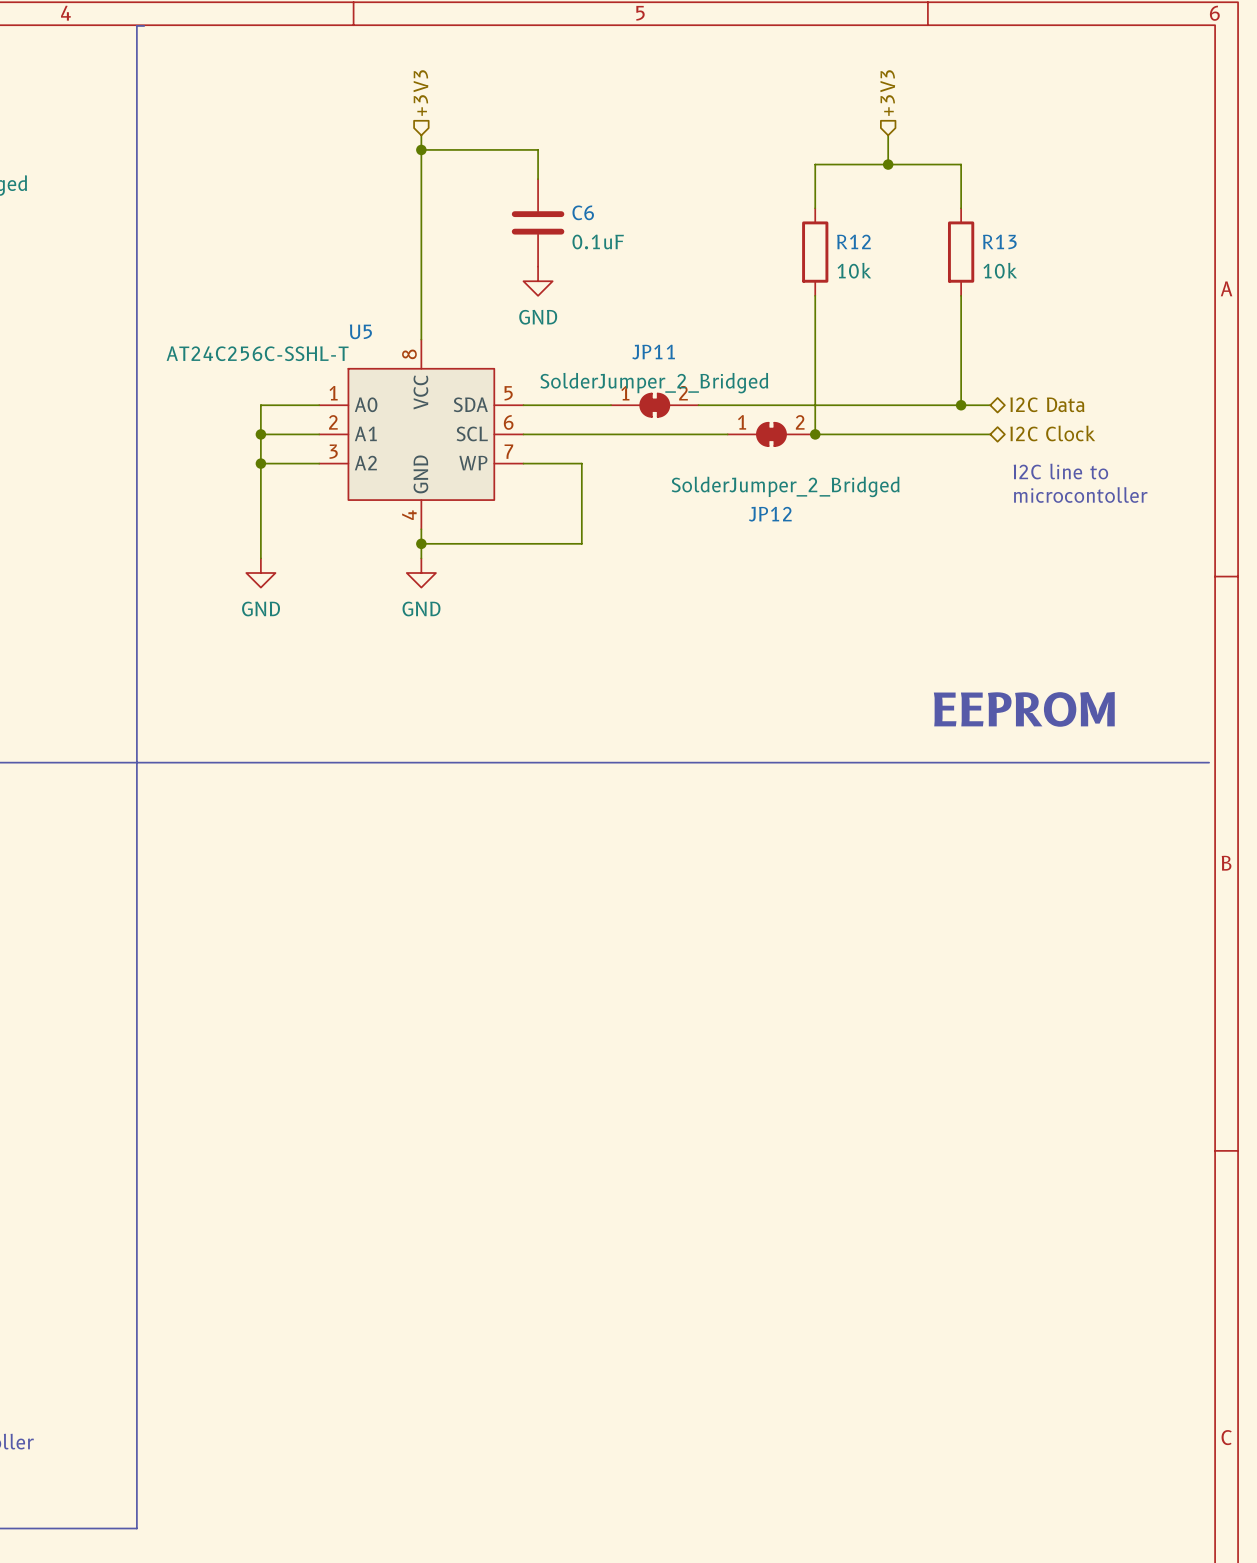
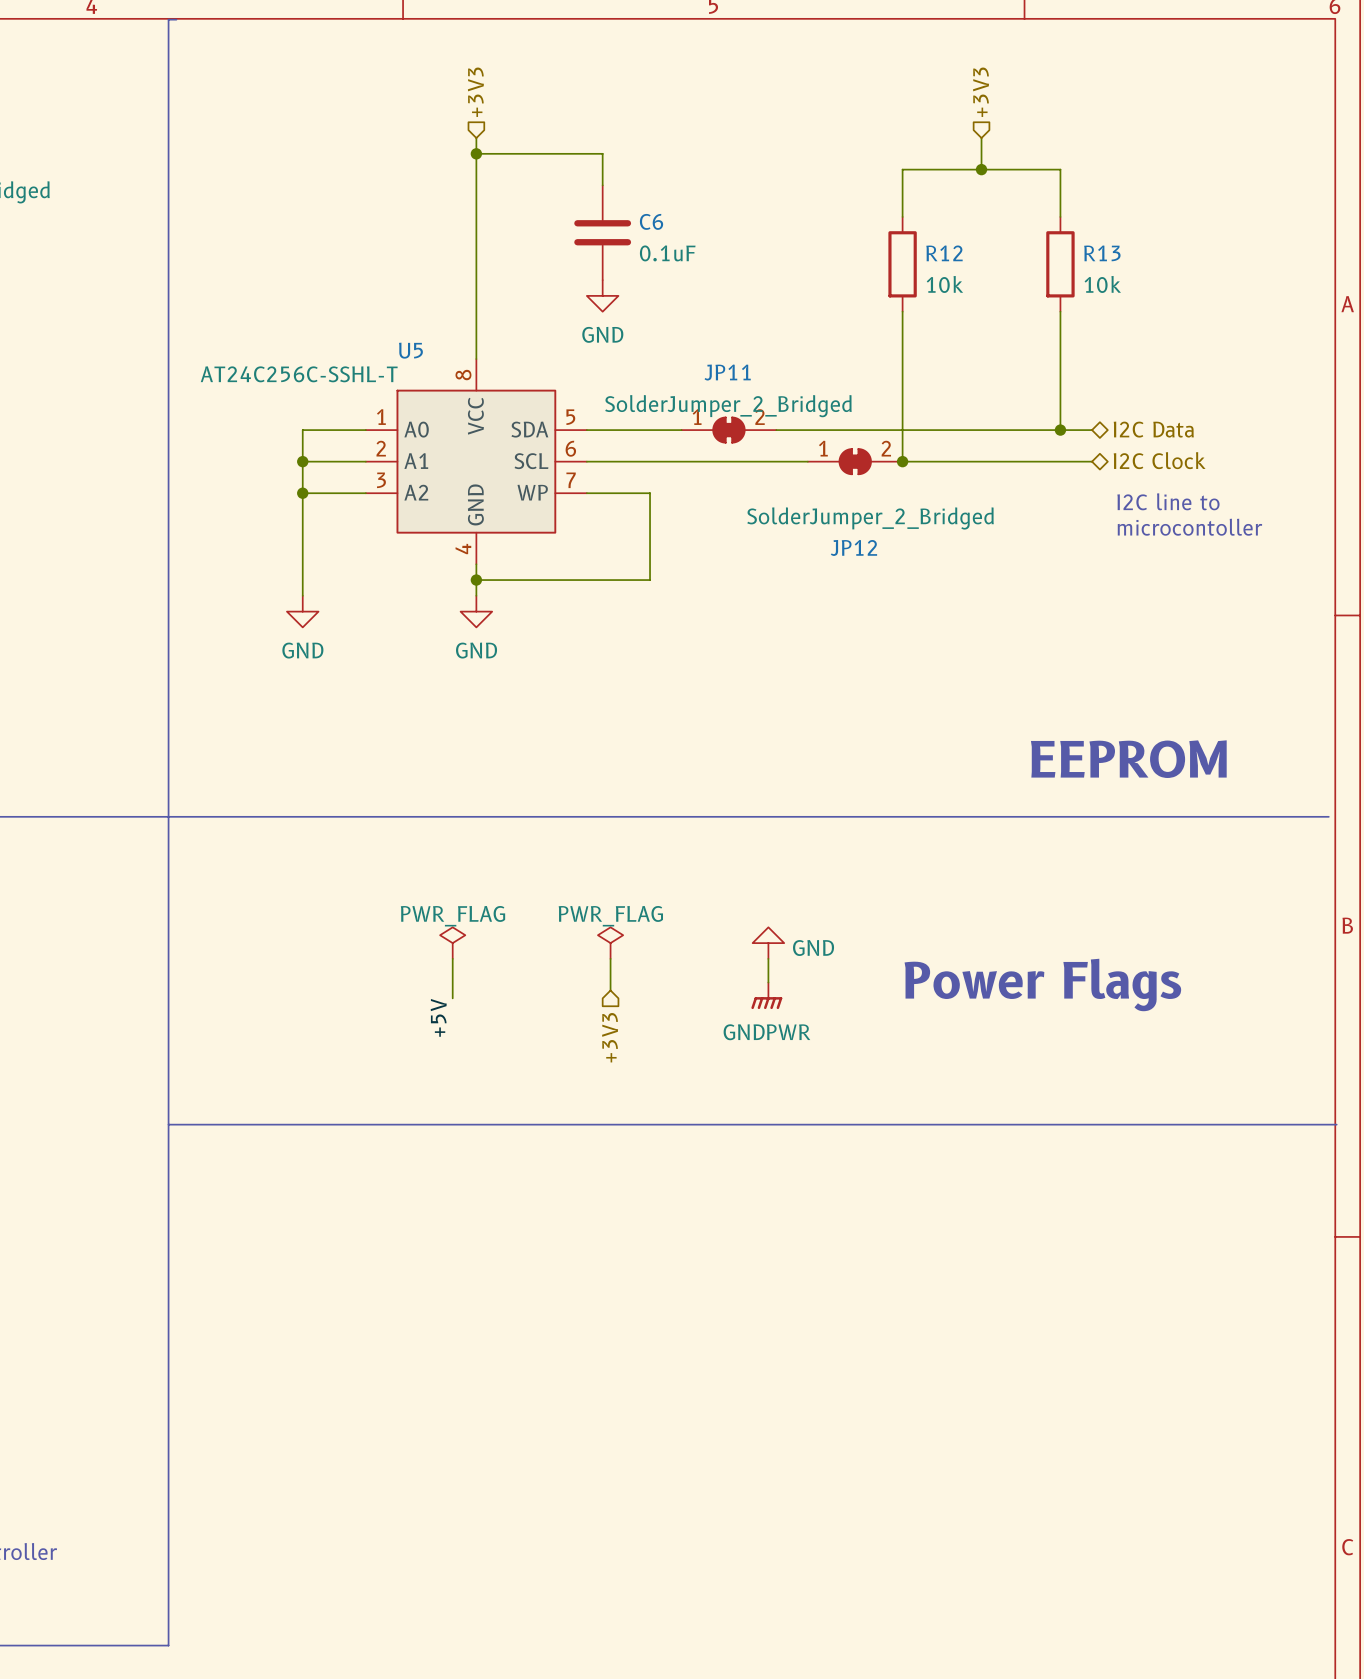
power symbol: none -> PWR_FLAG (452, 943)
power symbol: none -> PWR_FLAG (610, 943)
power symbol: none -> GND (768, 943)
wire: none -> (452, 958) (452, 998)
wire: none -> (610, 958) (610, 990)
wire: none -> (768, 958) (768, 982)
text: none -> Power Flags (1042, 984)
power symbol: none -> GNDPWR (766, 995)
label: none -> +5V (438, 1017)
hierarchical label: none -> +3V3 (610, 1037)
line: none -> (168, 1124) (1336, 1124)

